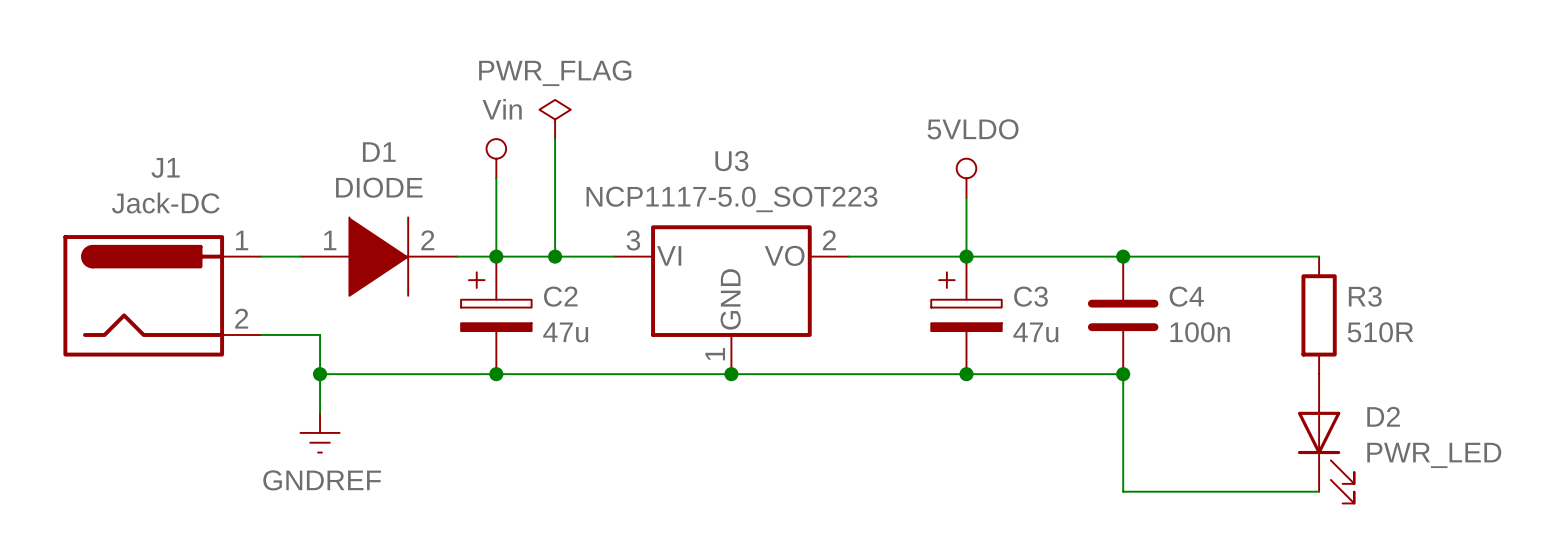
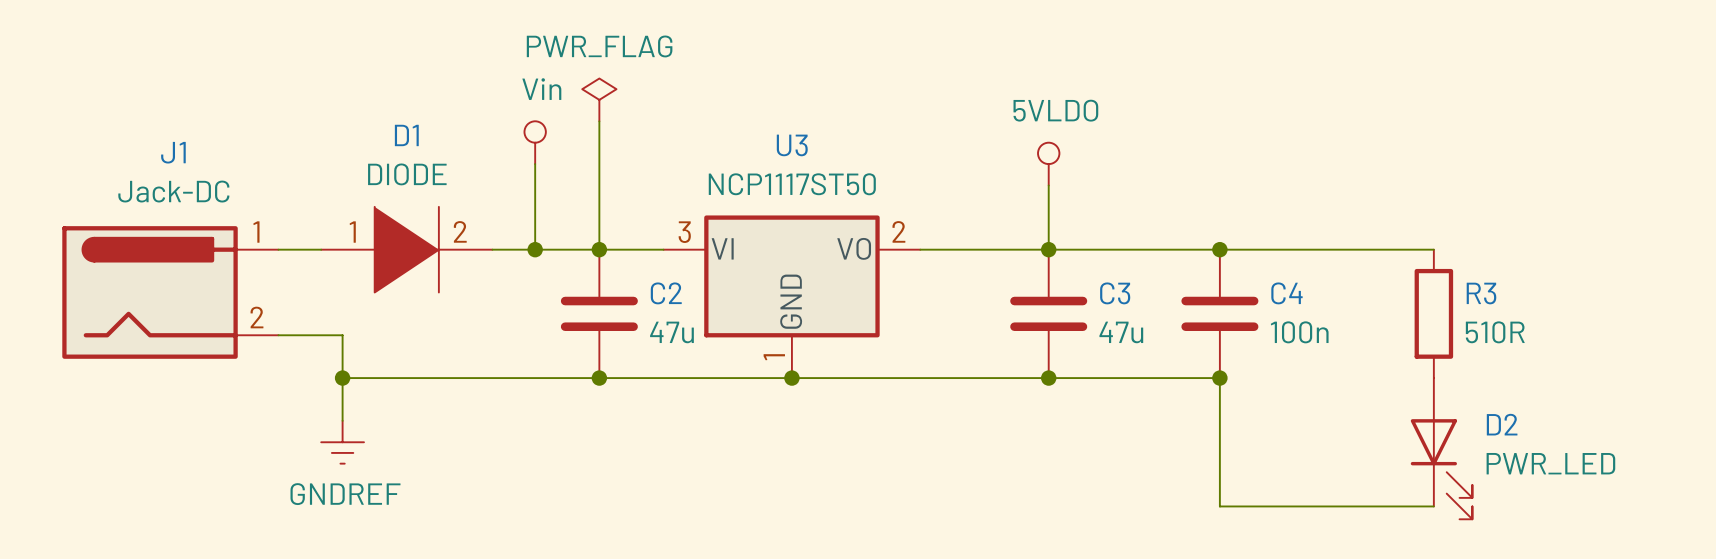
U3 value: NCP1117-5.0_SOT223 (731, 199) -> NCP1117ST50 (792, 184)
C2 symbol: [461, 256, 532, 375] -> [560, 249, 638, 379]
C3 symbol: [931, 256, 1002, 375] -> [1010, 249, 1088, 379]
junction position: (496, 374) -> (599, 378)

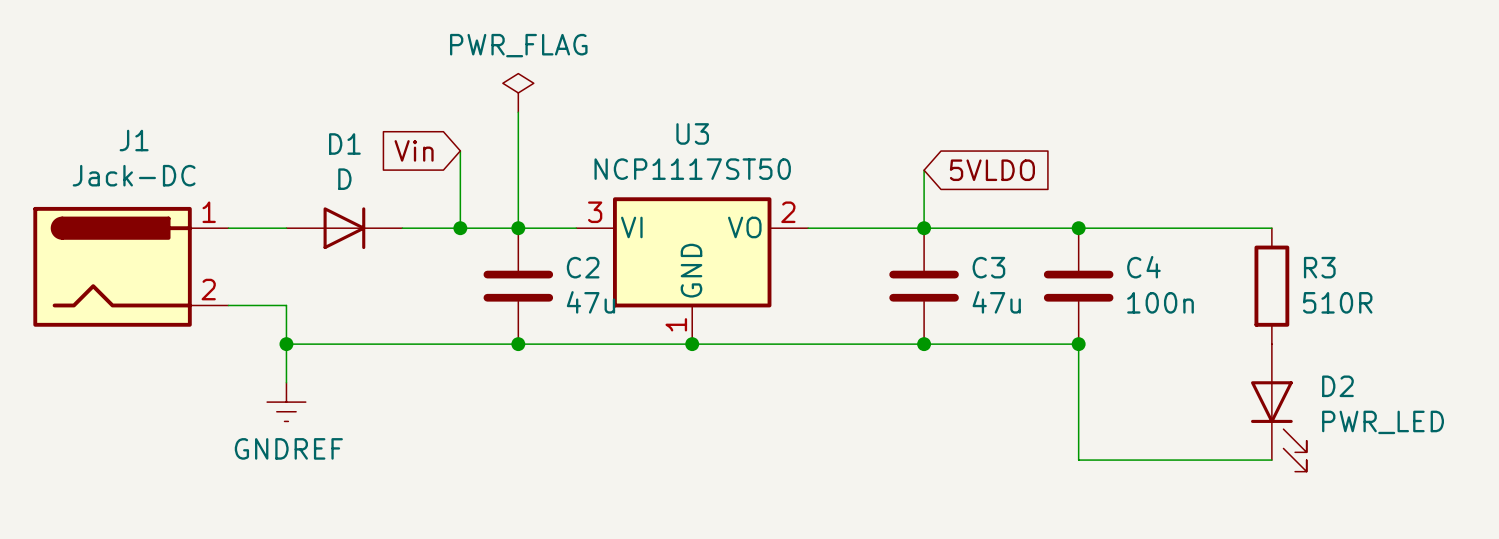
power symbol: Vin (535, 142) -> none
global label: none -> Vin (414, 150)
power symbol: 5VLDO (1048, 164) -> none
D1 value: DIODE (407, 174) -> D (344, 179)
global label: none -> 5VLDO (992, 170)
D1 symbol: [321, 206, 493, 293] -> [286, 207, 403, 250]

